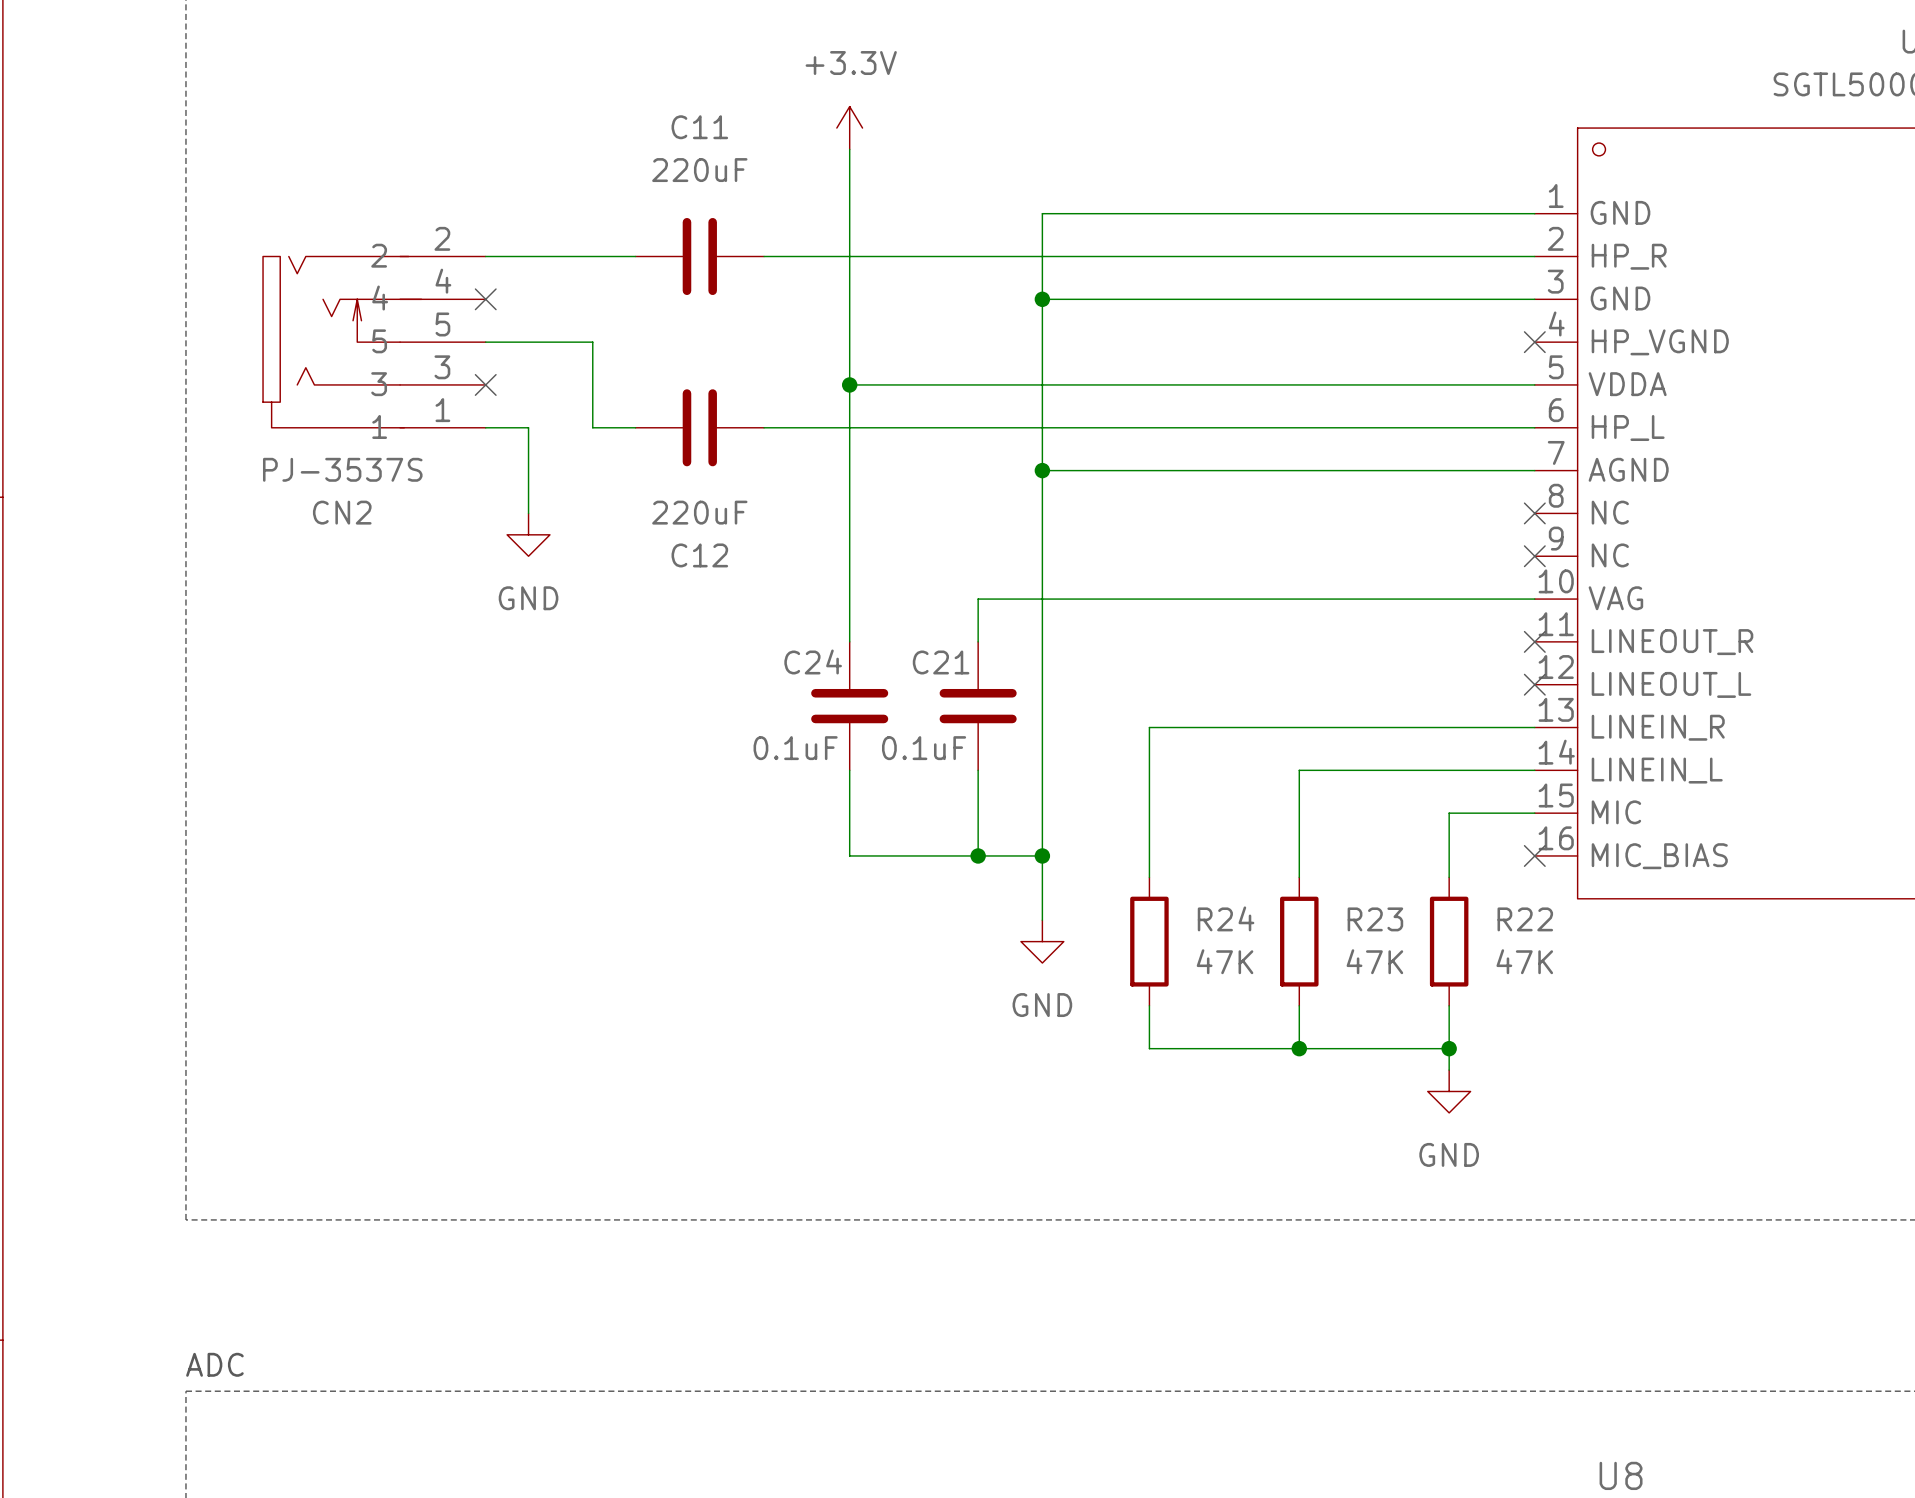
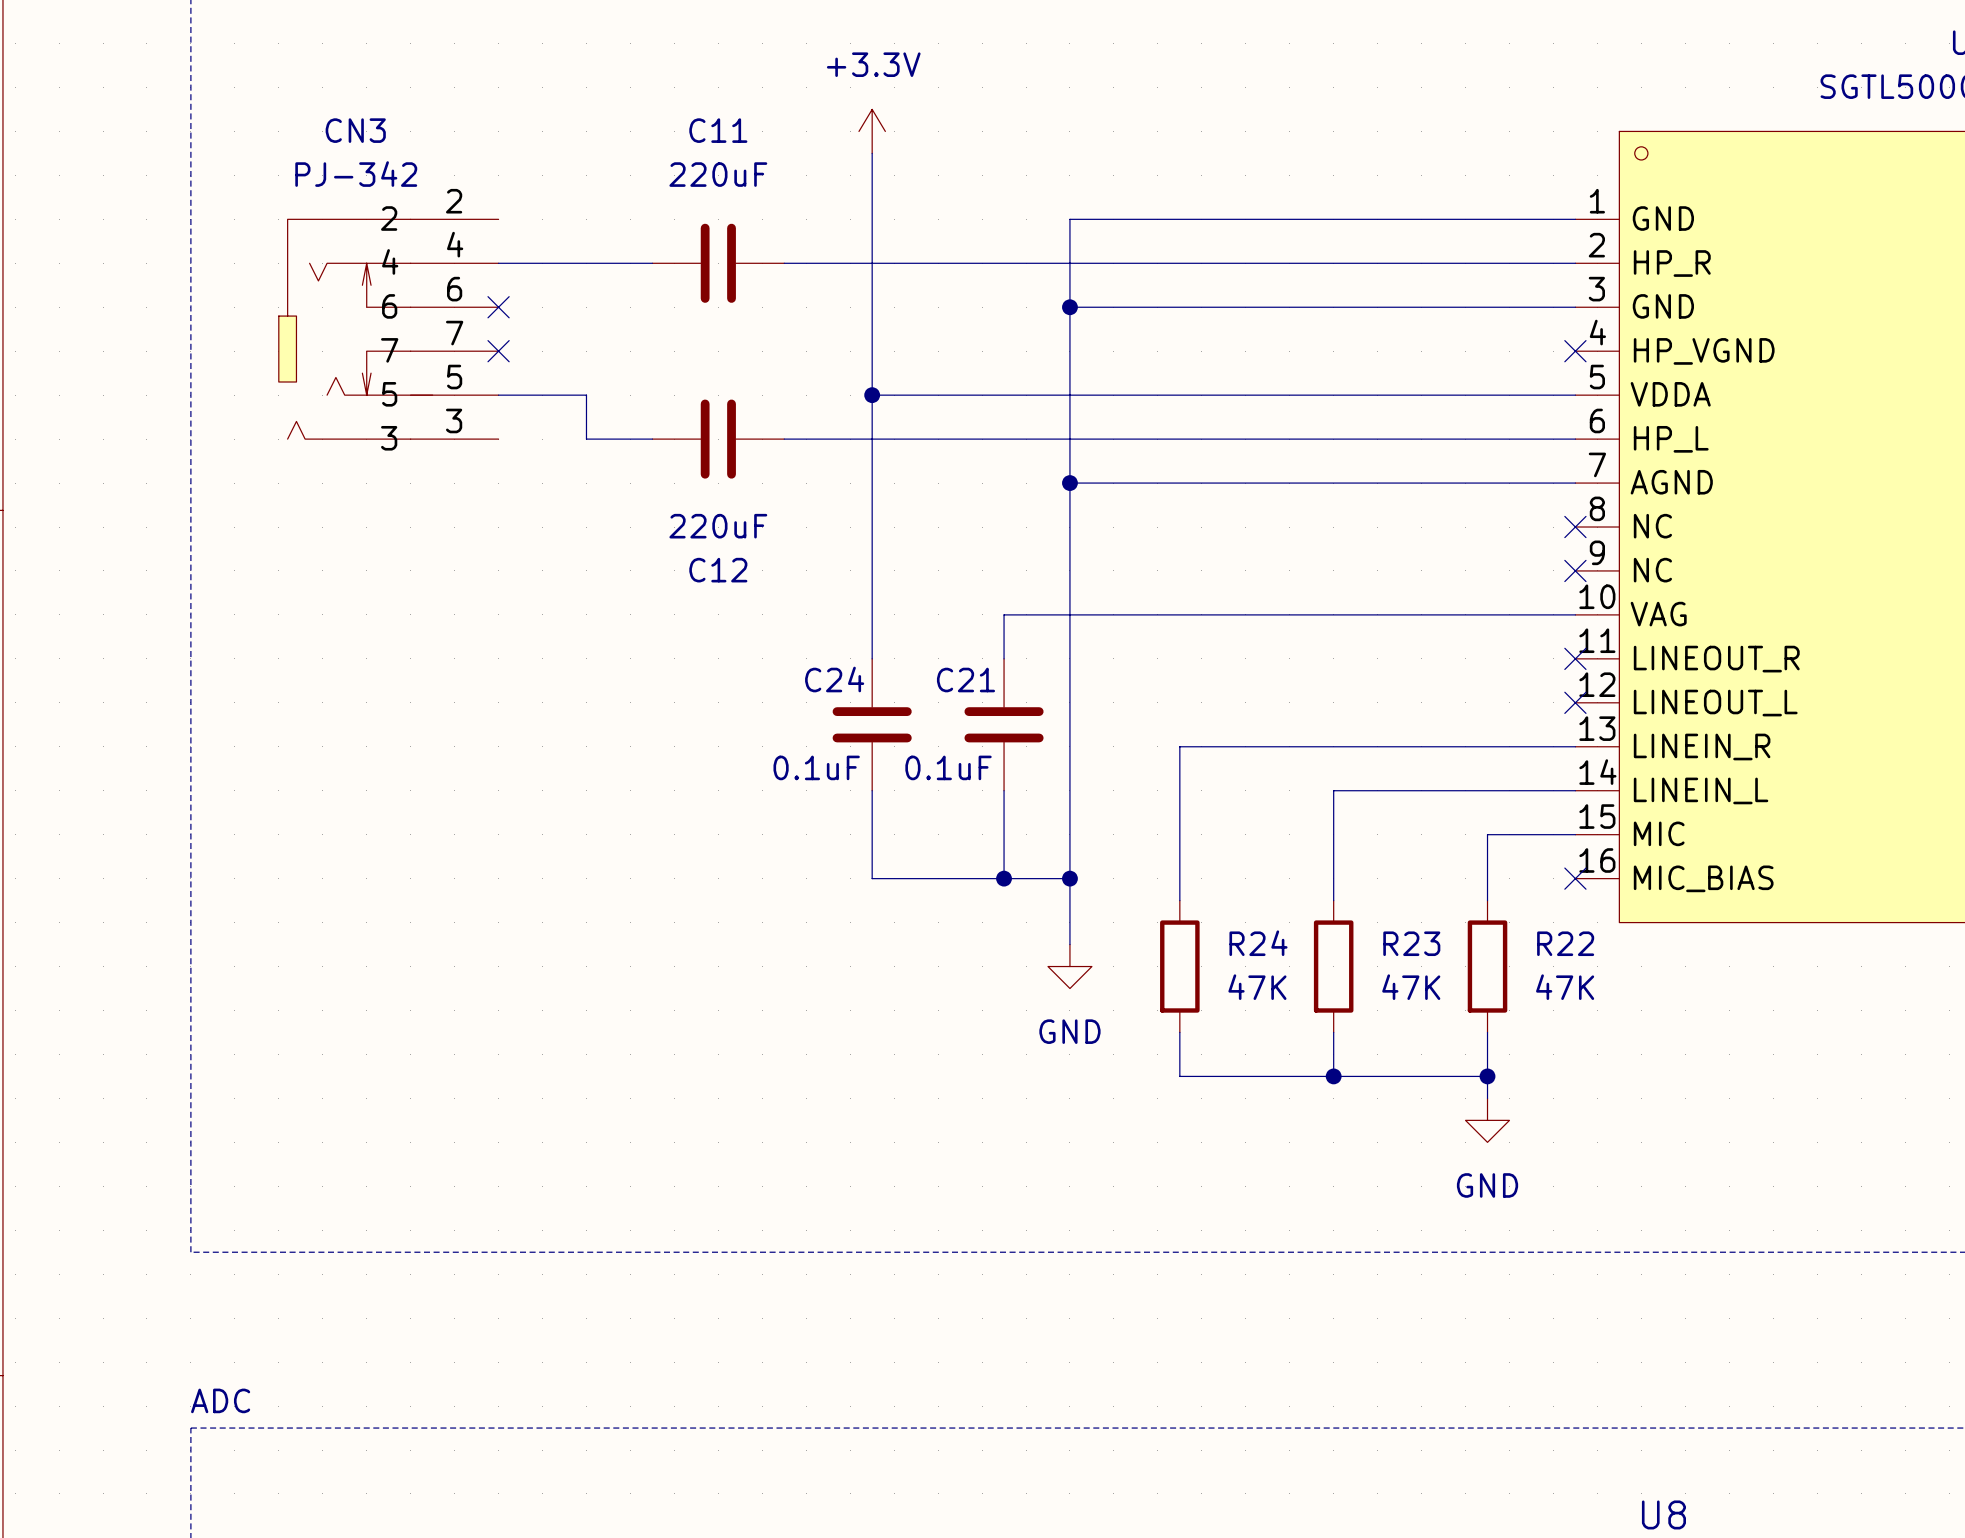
CN3: none -> PJ-342 (388, 329)
CN2: PJ-3537S (374, 342) -> none
wire: (485, 342) (592, 342) (592, 427) -> (498, 395) (586, 395) (586, 439) (608, 439)
no-connect mark position: (485, 384) -> (498, 351)
wire: (485, 427) (528, 427) (528, 513) -> none
power symbol: GND (528, 534) -> none

